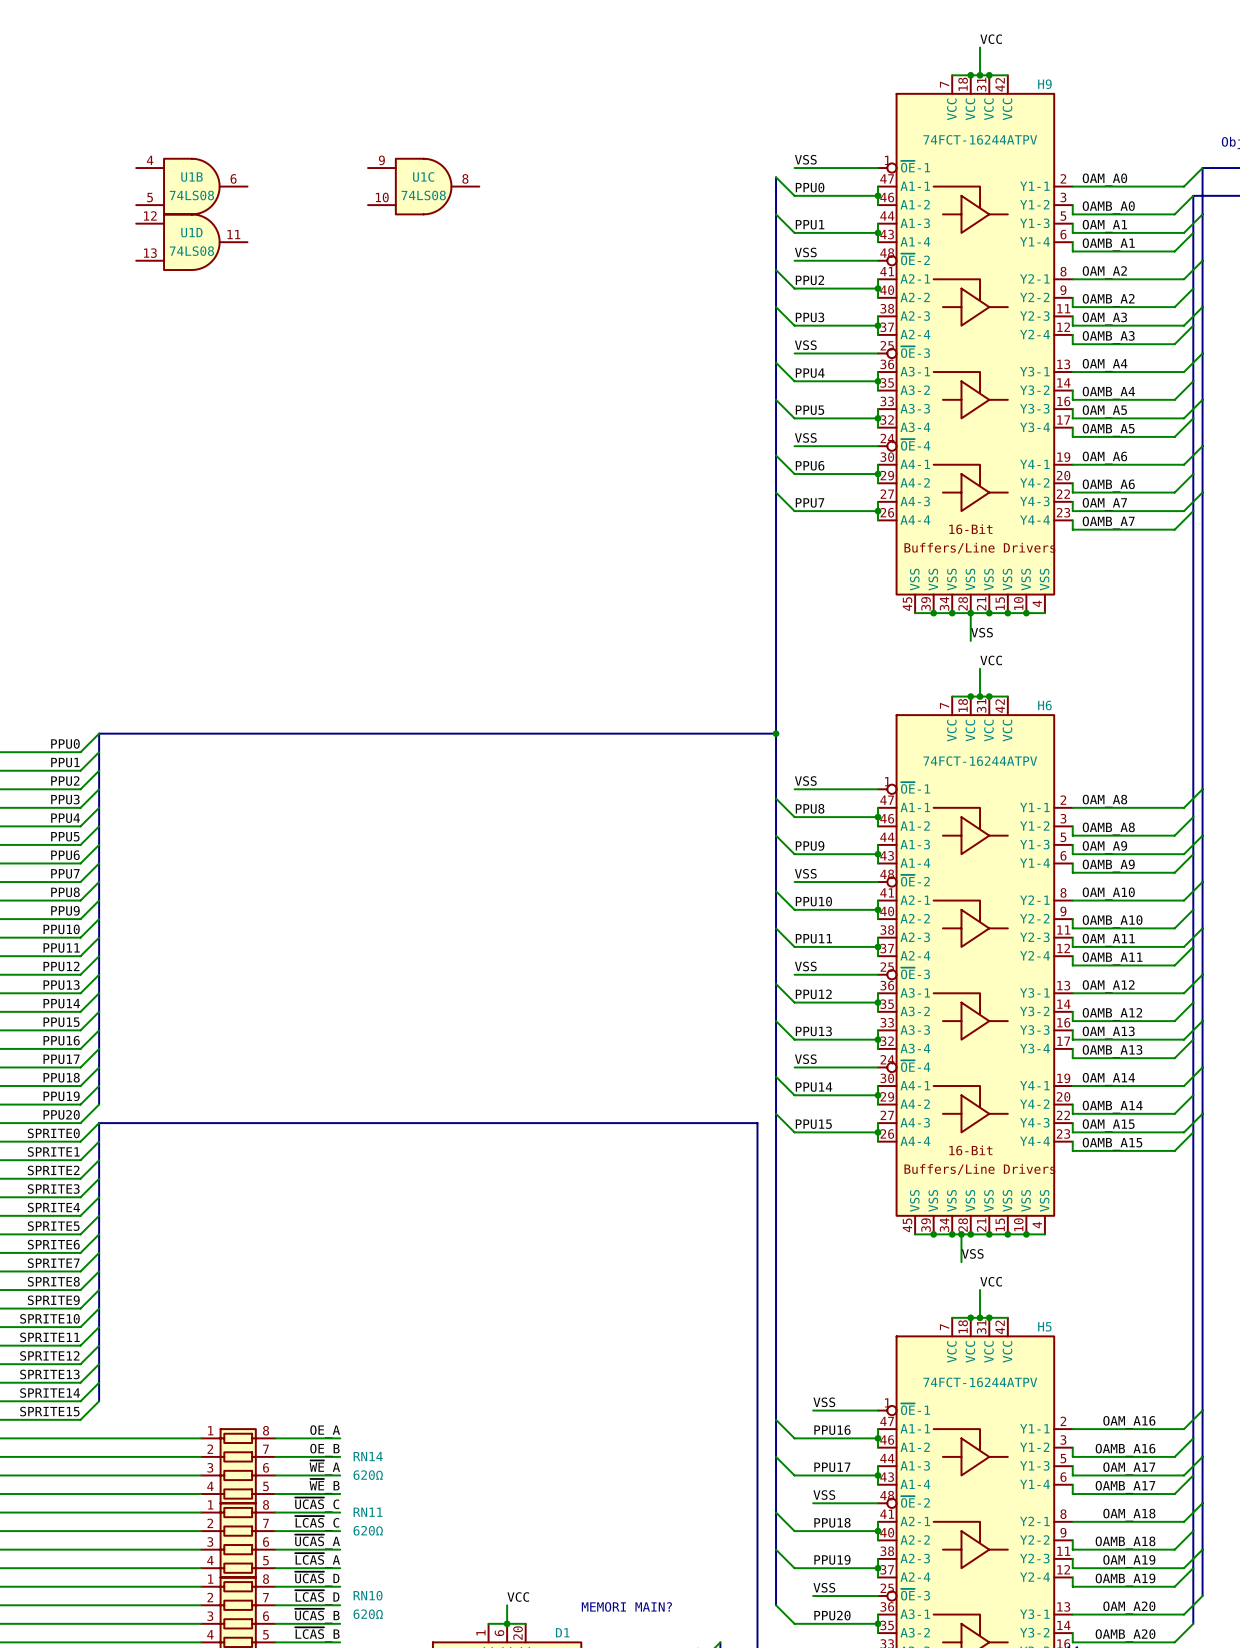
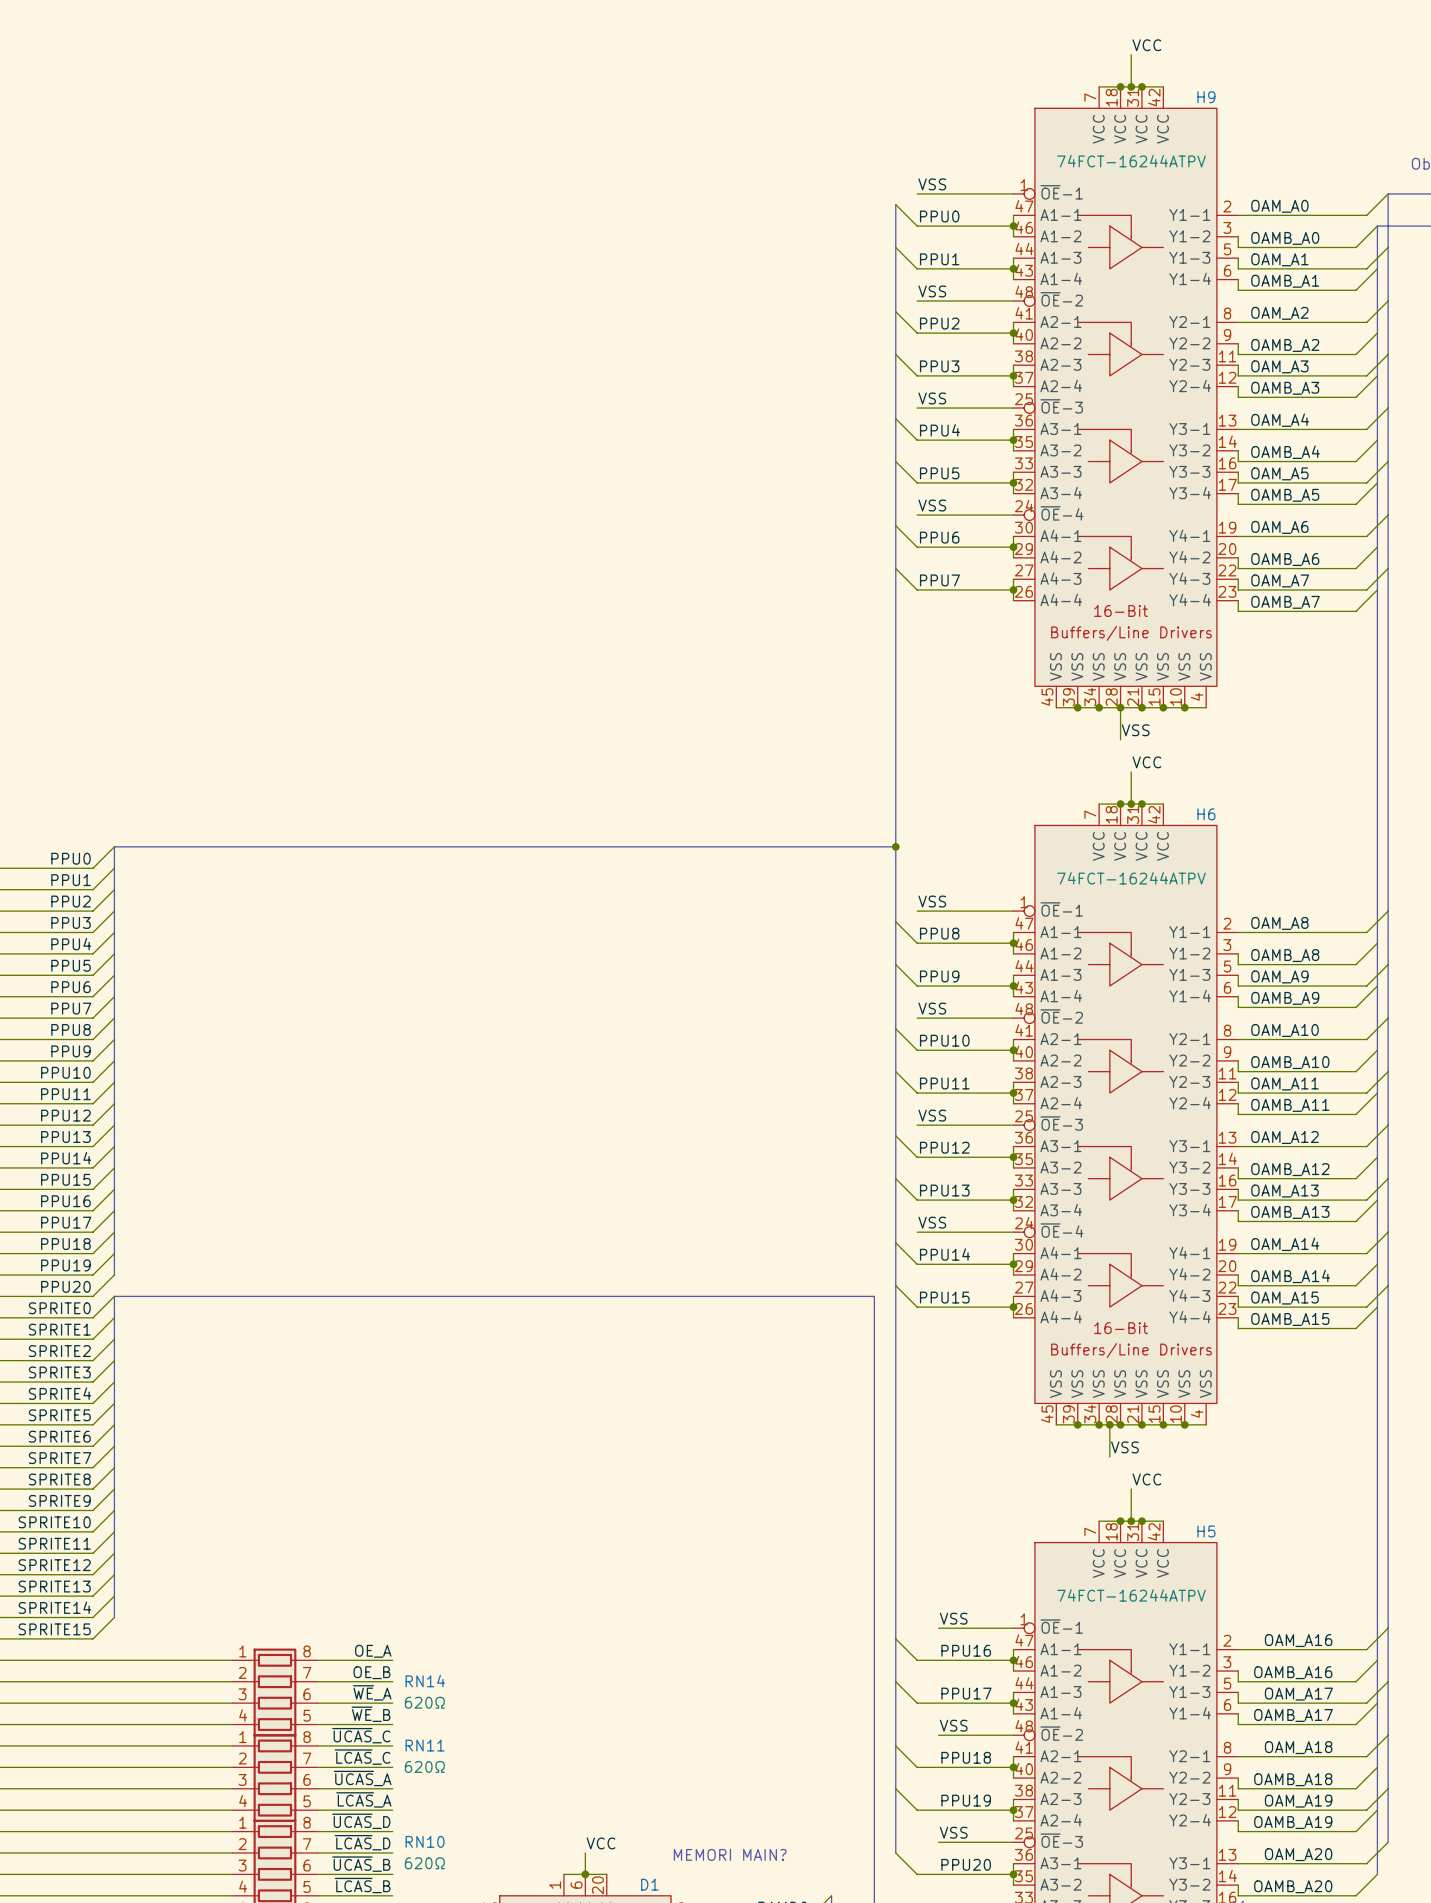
U1B: 74LS08 (191, 186) -> none
U1C: 74LS08 (423, 186) -> none
U1D: 74LS08 (191, 242) -> none

